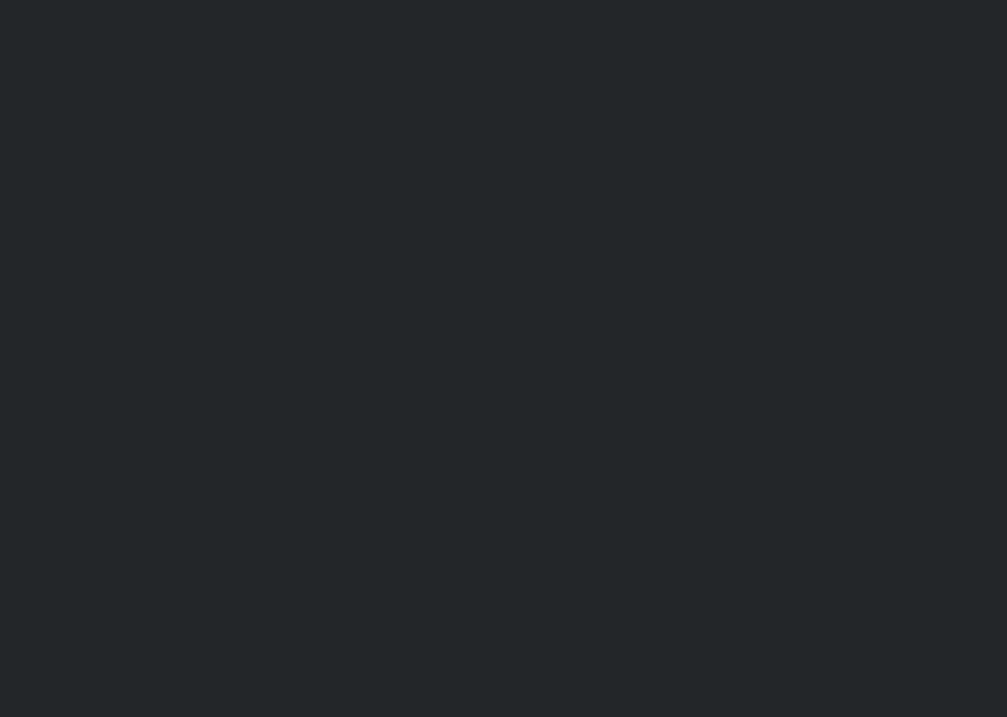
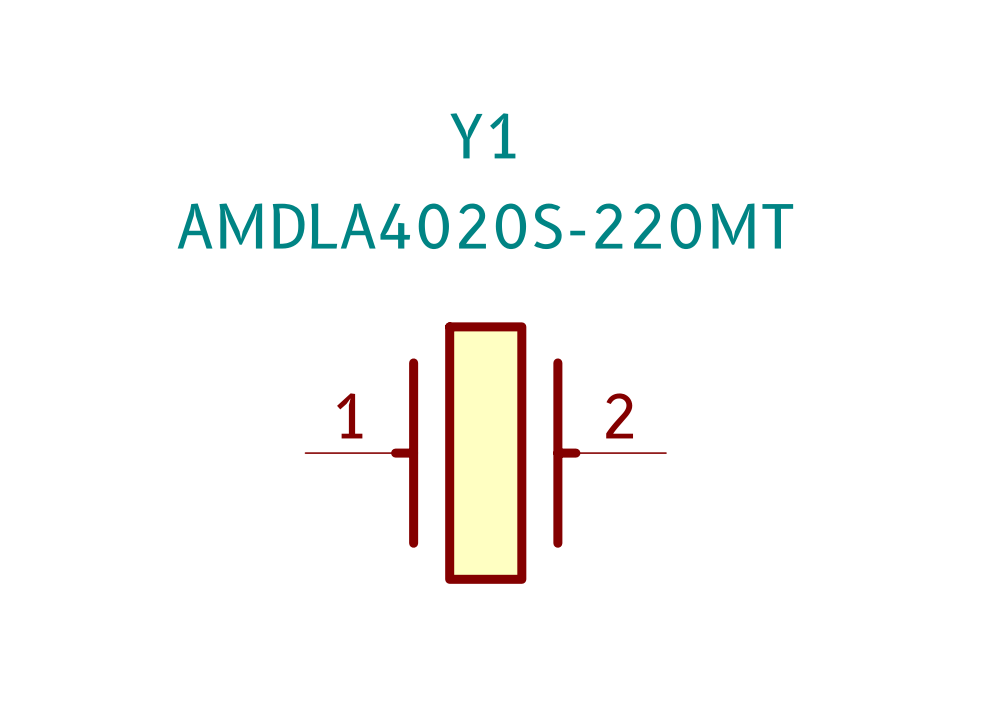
Y1: none -> AMDLA4020S-220MT (485, 453)

